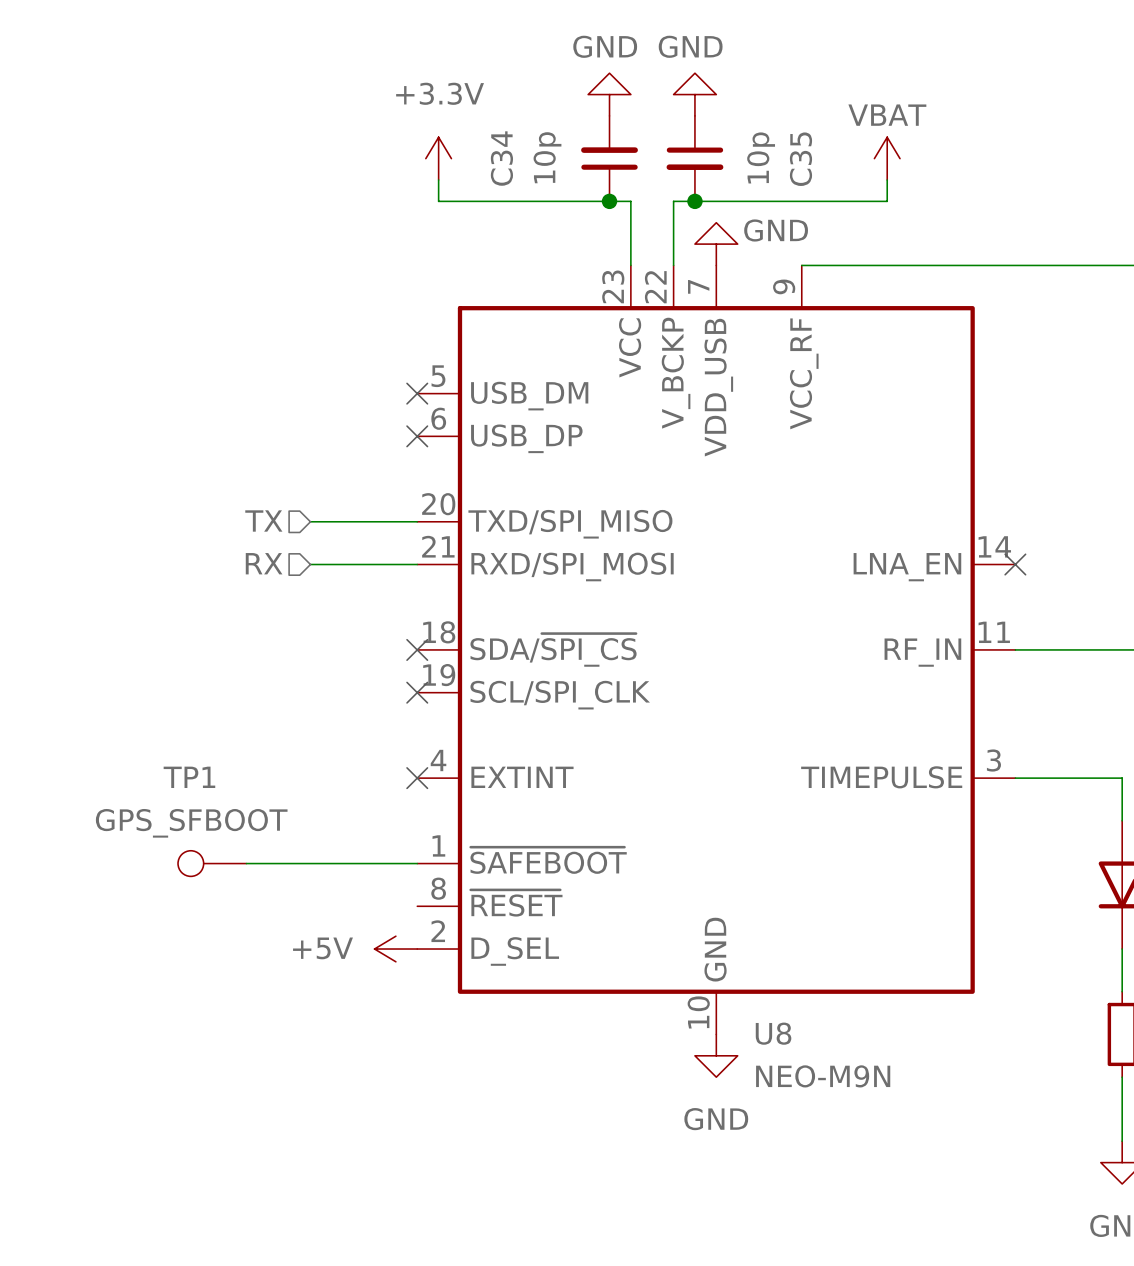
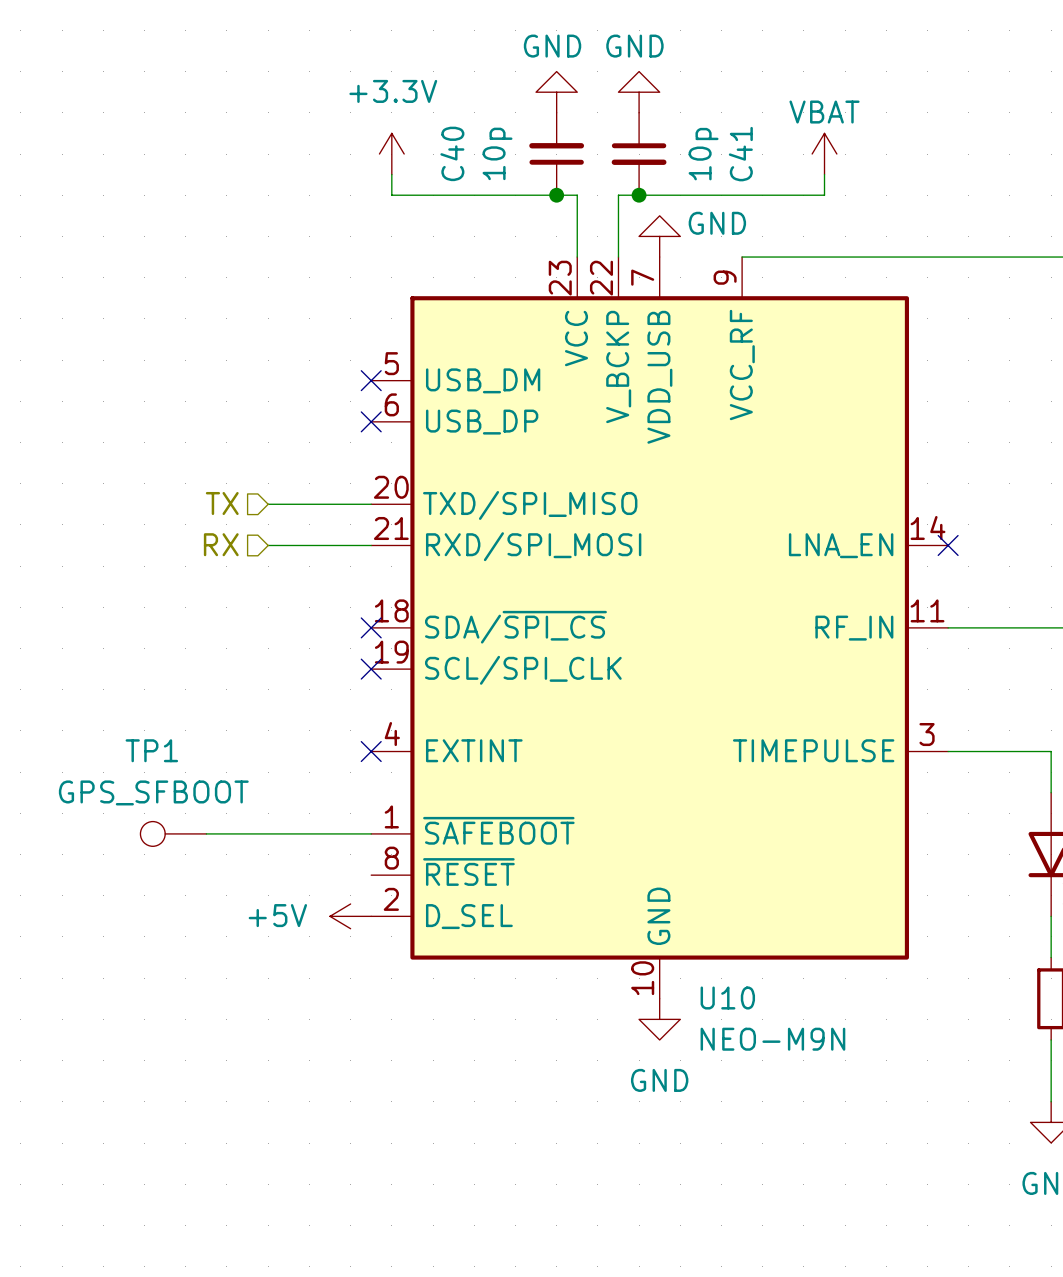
C34 name: C34 (501, 158) -> C40 (452, 153)
C35 name: C35 (800, 159) -> C41 (740, 154)
U8 name: U8 (773, 1033) -> U10 (727, 998)

